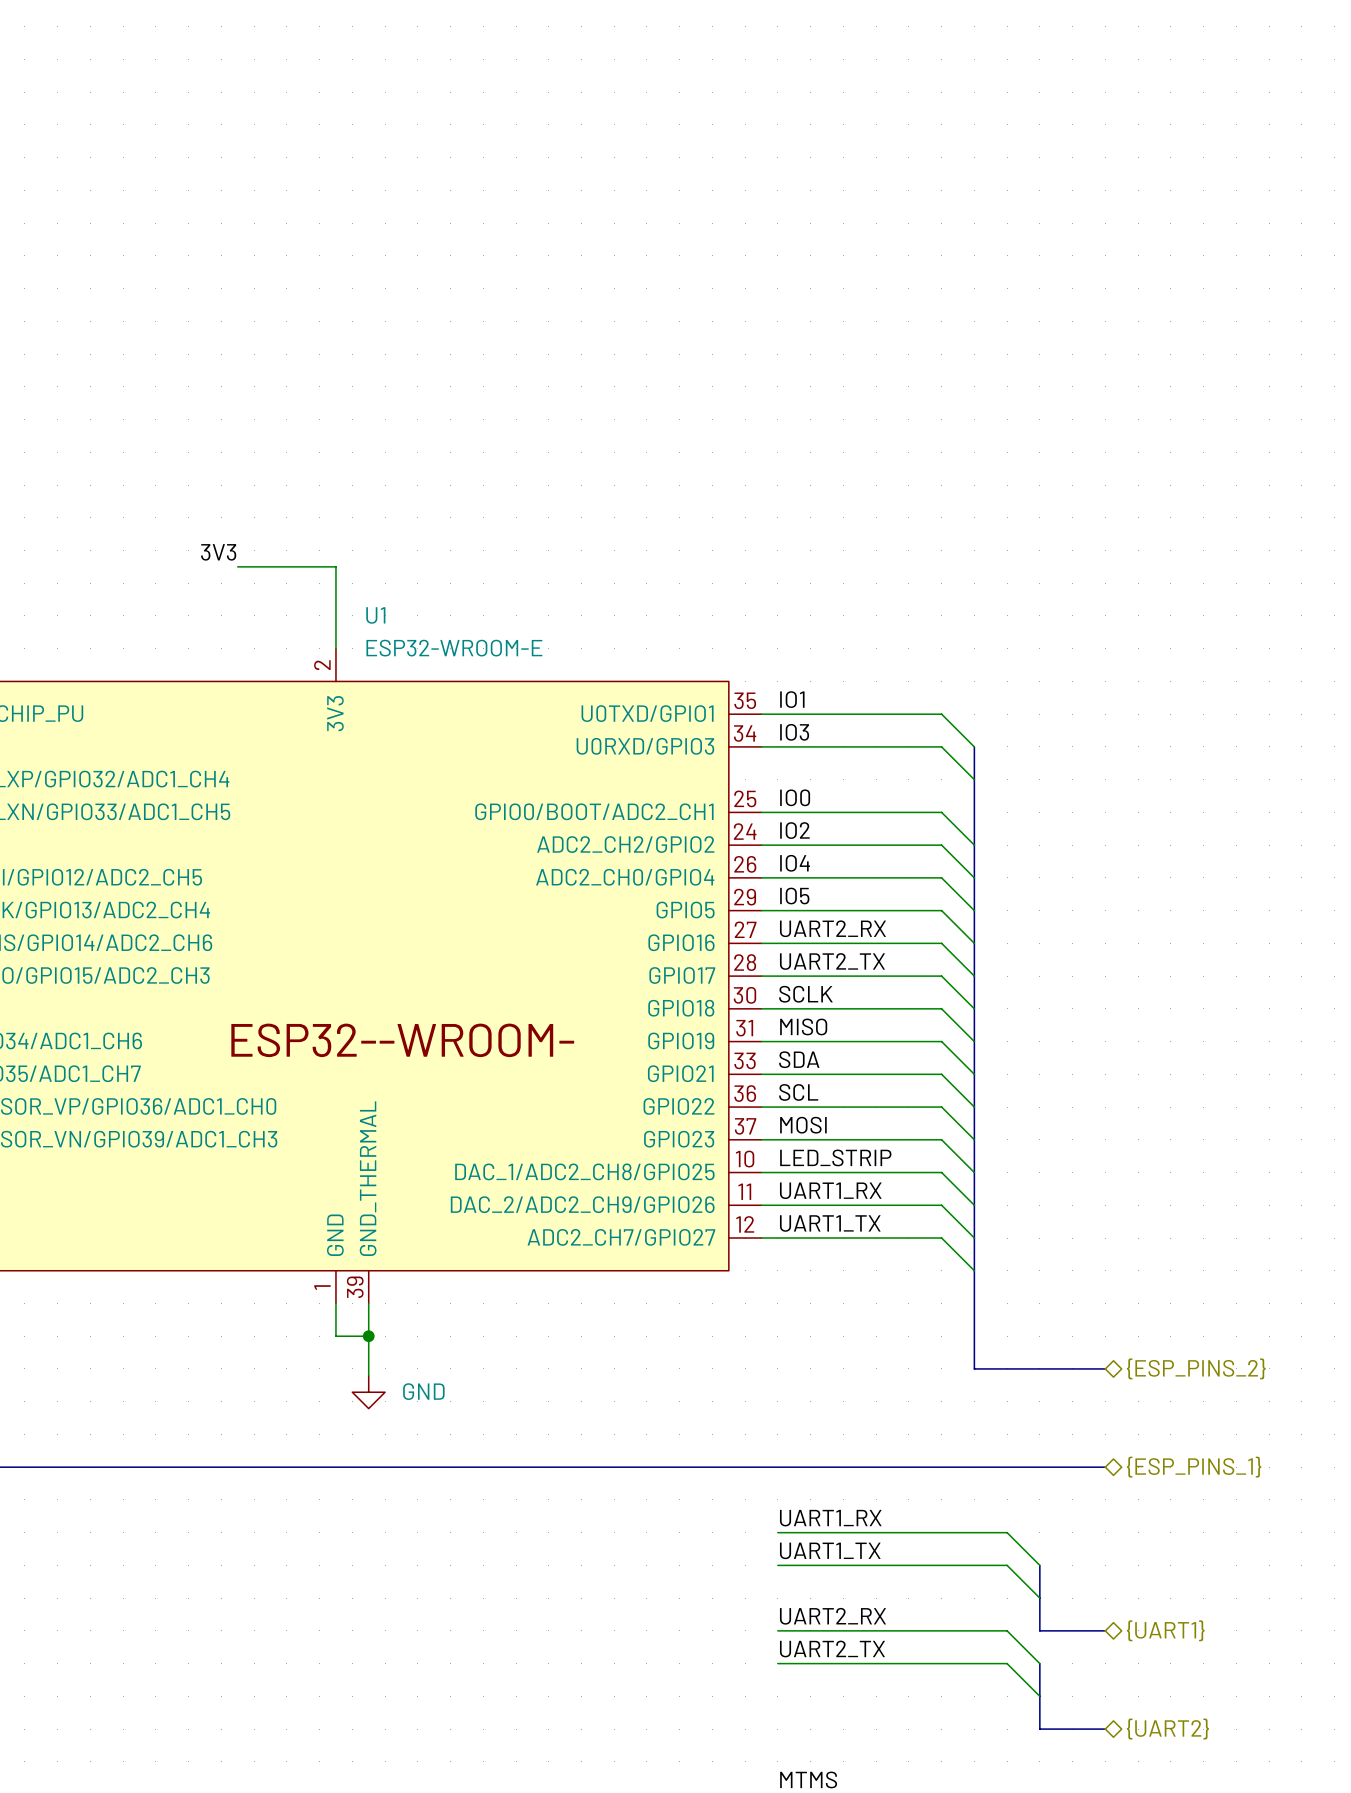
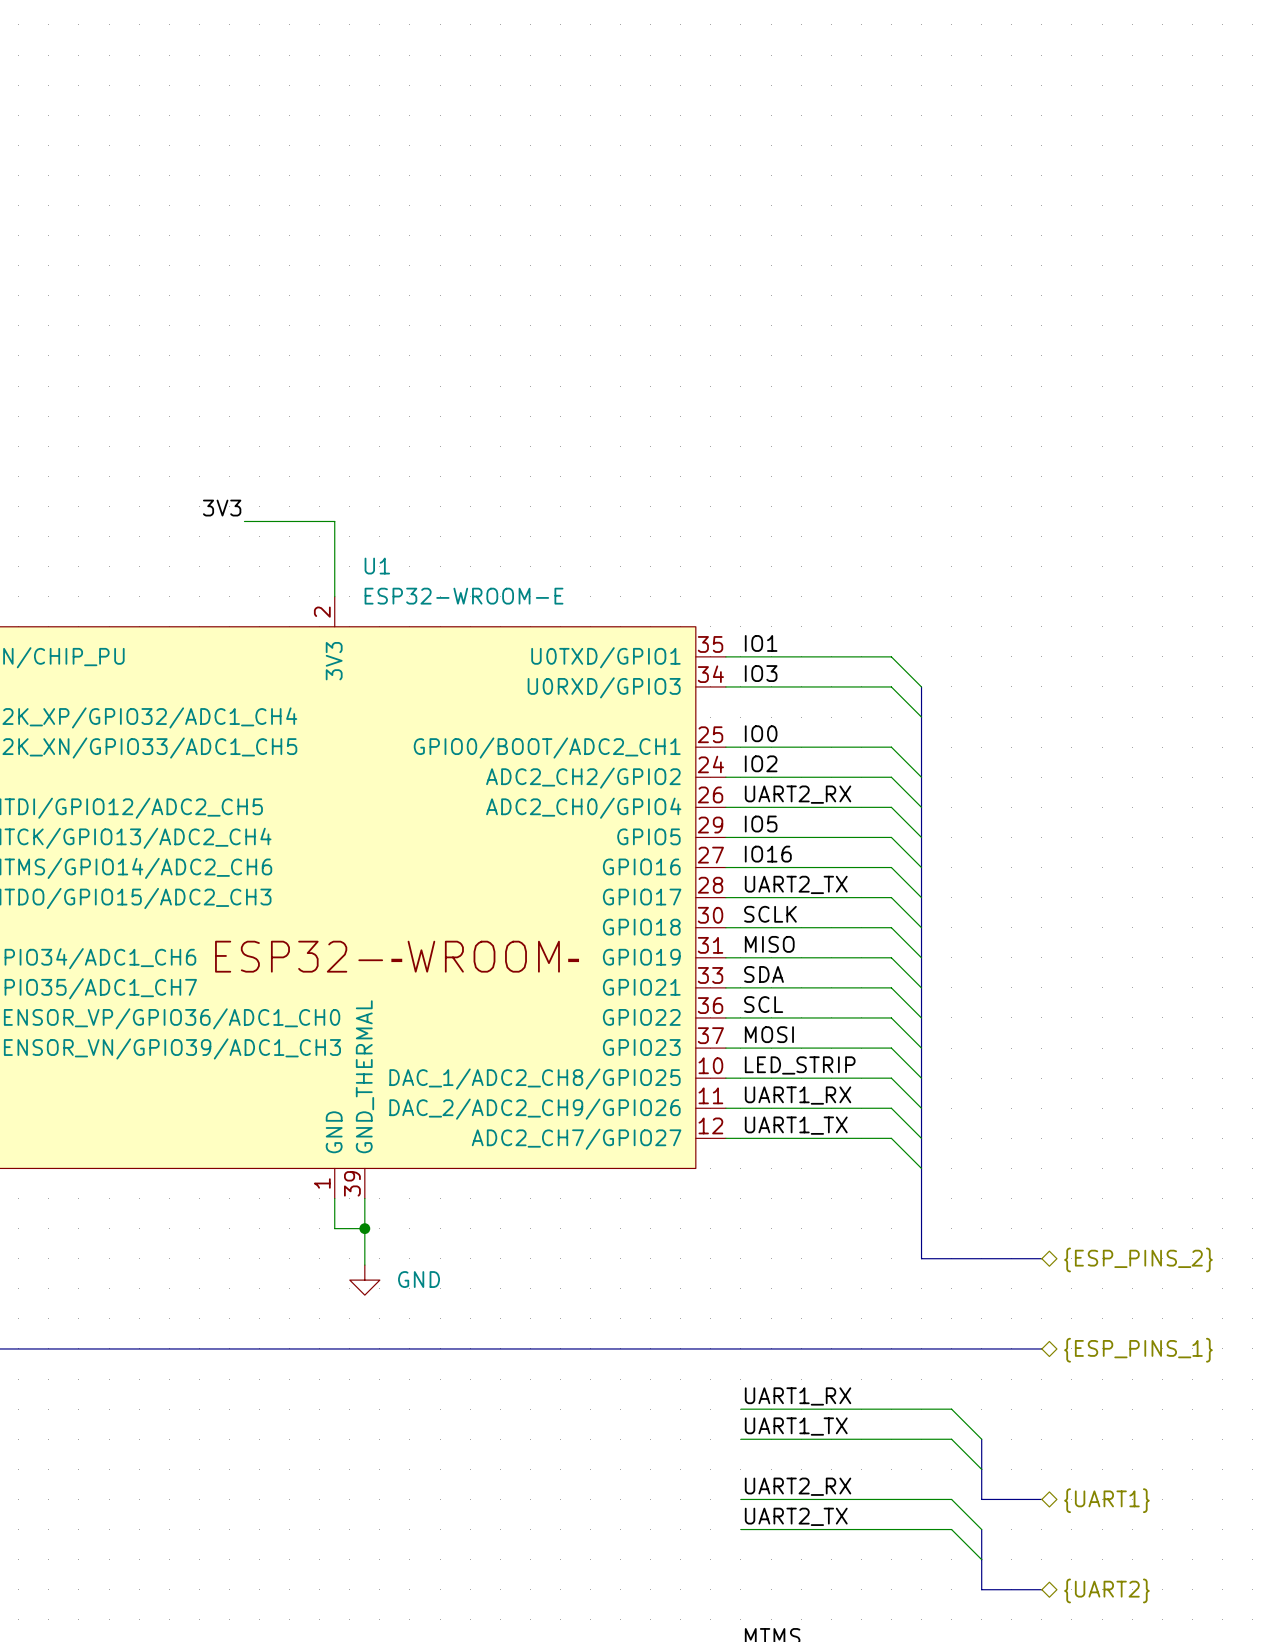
label: IO4 (795, 863) -> UART2_RX (798, 794)
label: UART2_RX (832, 928) -> IO16 (768, 854)

